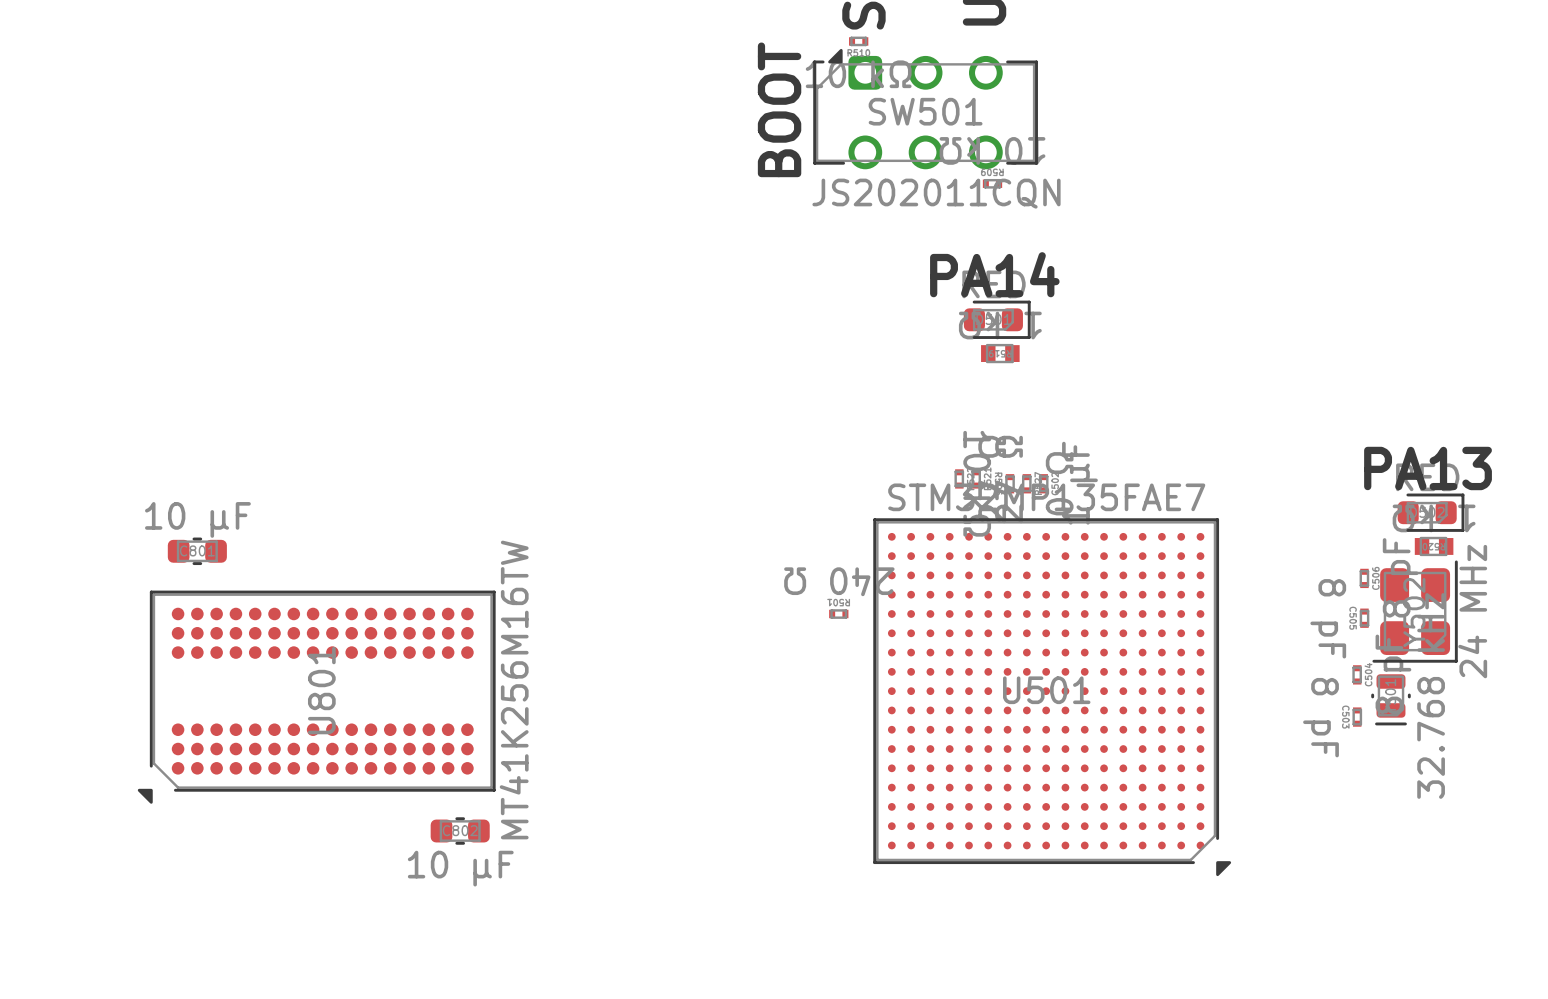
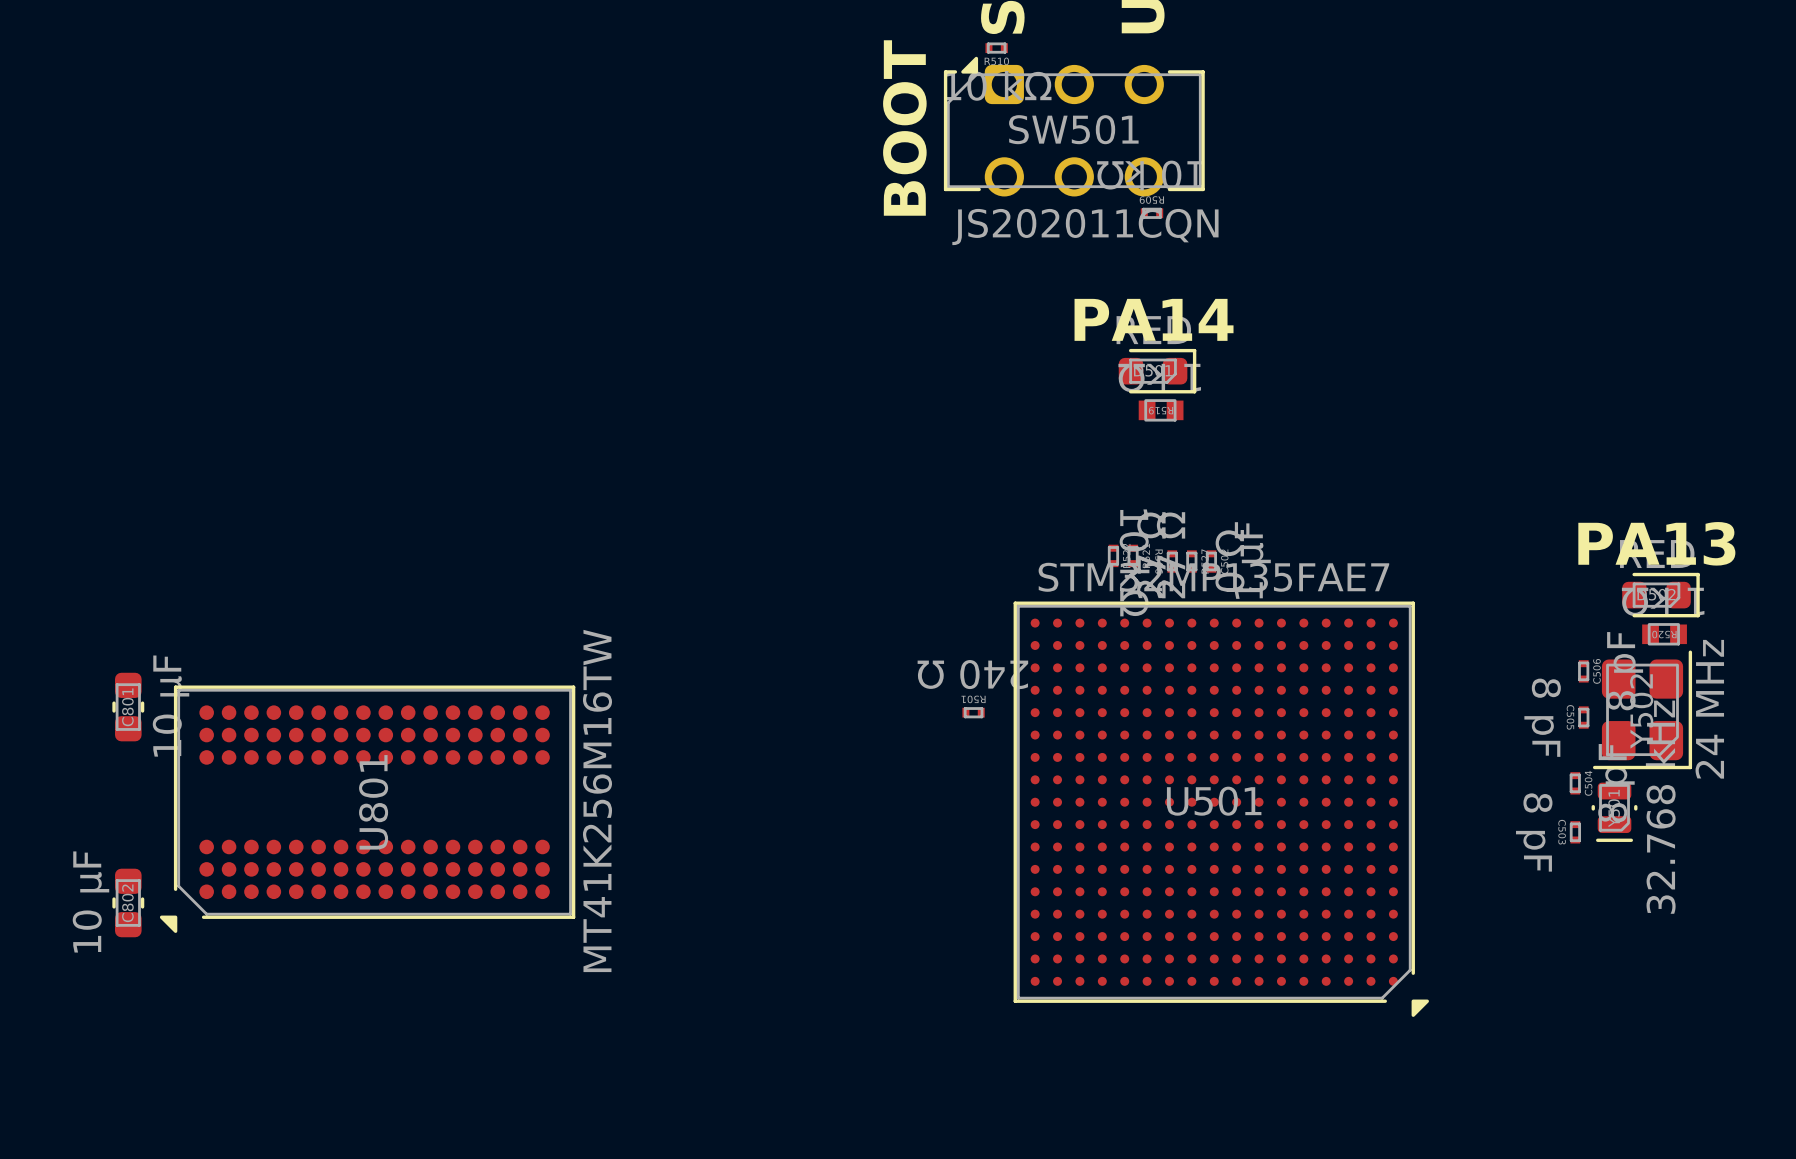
C801 rotation: 0° (197, 551) -> 90° clockwise (128, 707)
C801 position: (197, 551) -> (128, 707)
C802 rotation: 0° (460, 831) -> 90° clockwise (128, 902)
C802 position: (460, 831) -> (128, 902)

